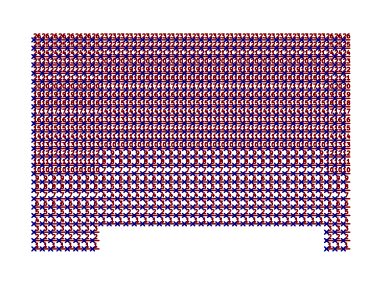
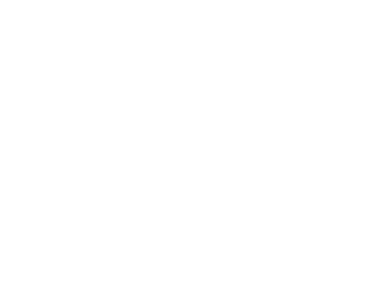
part: (103, 131) -> none
part: (111, 131) -> none
part: (119, 131) -> none
part: (128, 131) -> none
part: (136, 131) -> none
part: (144, 131) -> none
part: (153, 131) -> none
part: (161, 131) -> none
part: (169, 131) -> none
part: (178, 131) -> none
part: (186, 131) -> none
part: (195, 131) -> none
part: (203, 131) -> none
part: (211, 131) -> none
part: (220, 131) -> none
part: (228, 131) -> none
part: (236, 131) -> none
part: (245, 131) -> none
part: (253, 131) -> none
part: (261, 131) -> none
part: (270, 131) -> none
part: (278, 131) -> none
part: (287, 131) -> none
part: (295, 131) -> none
part: (303, 131) -> none
part: (312, 131) -> none
part: (320, 131) -> none
part: (36, 144) -> none
part: (44, 144) -> none
part: (52, 144) -> none
part: (61, 144) -> none
part: (69, 144) -> none
part: (77, 144) -> none
part: (86, 144) -> none
part: (94, 144) -> none
part: (328, 144) -> none
part: (337, 144) -> none
part: (345, 144) -> none

